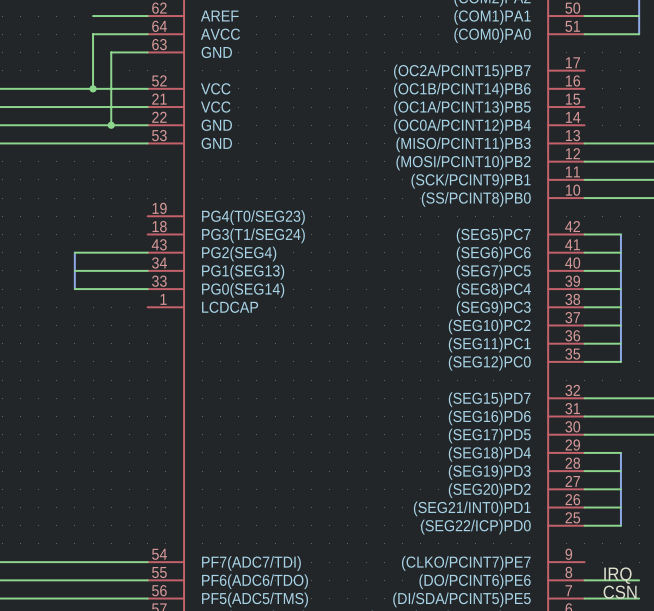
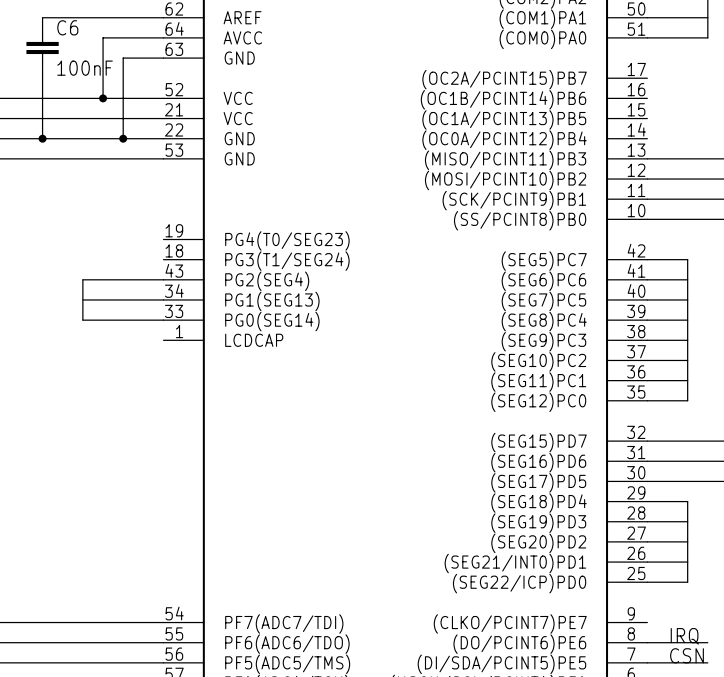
wire: none -> (42, 17) (103, 17)
C6: none -> 100nF (42, 47)
wire: none -> (42, 78) (42, 138)
junction: none -> (42, 138)

